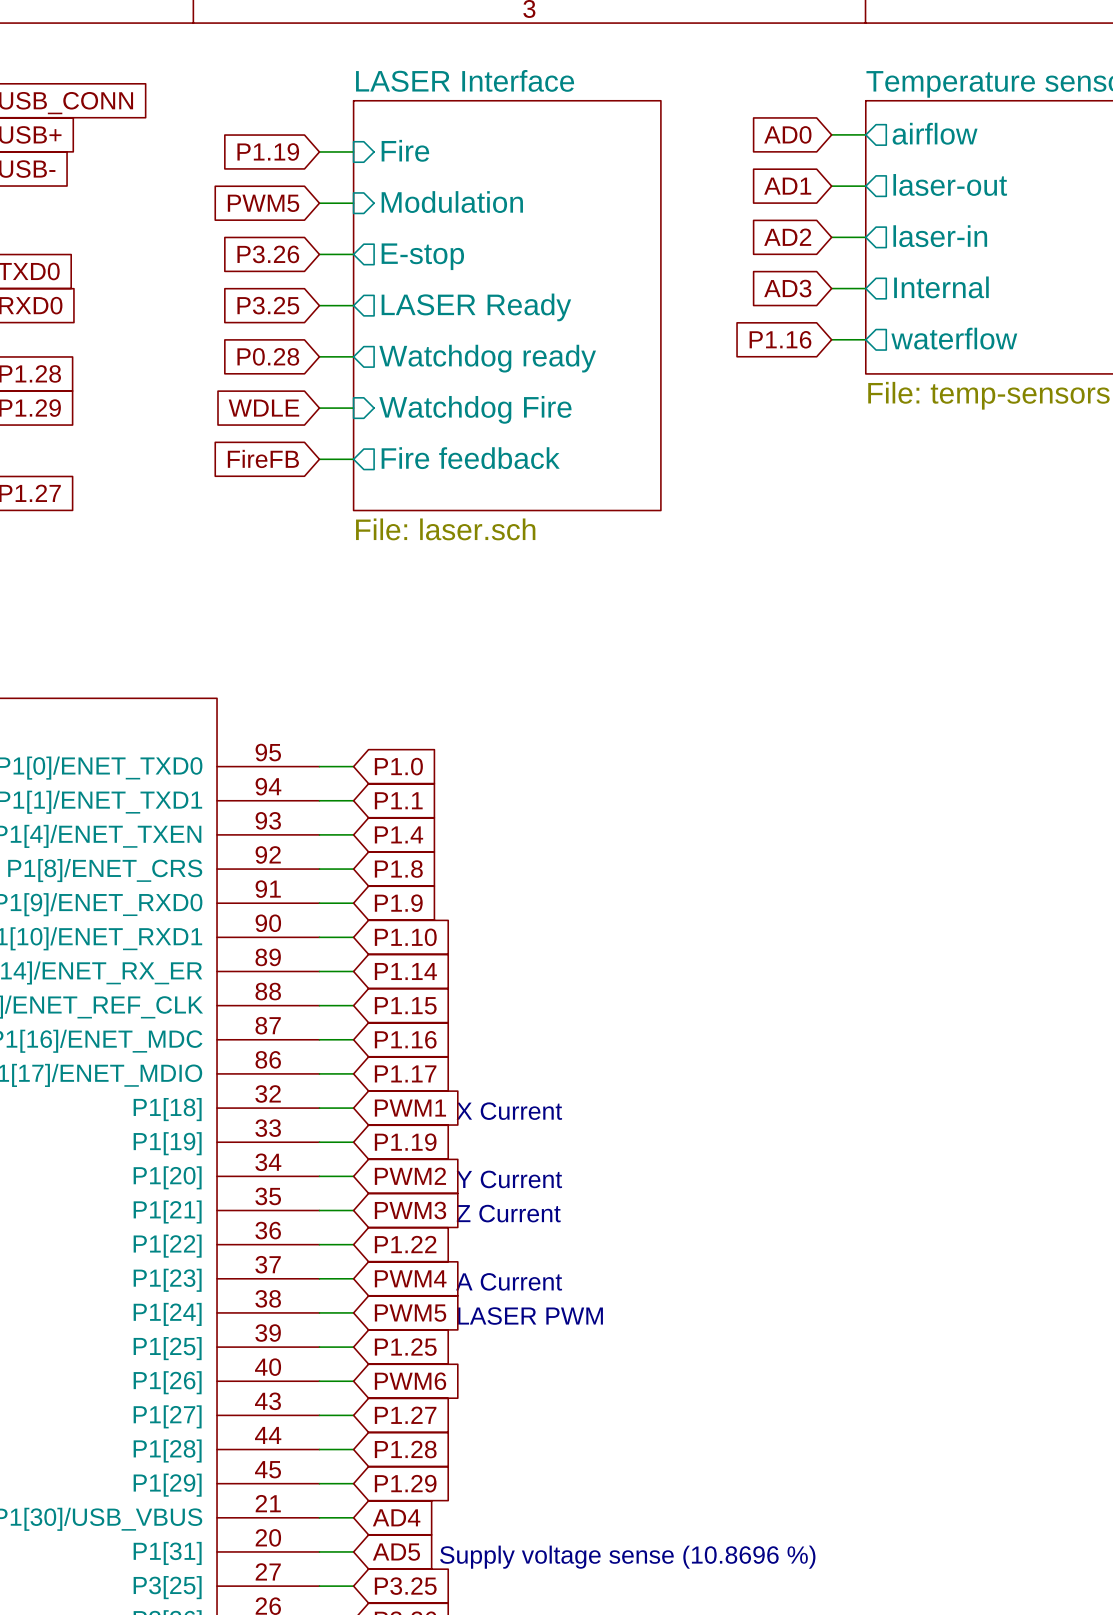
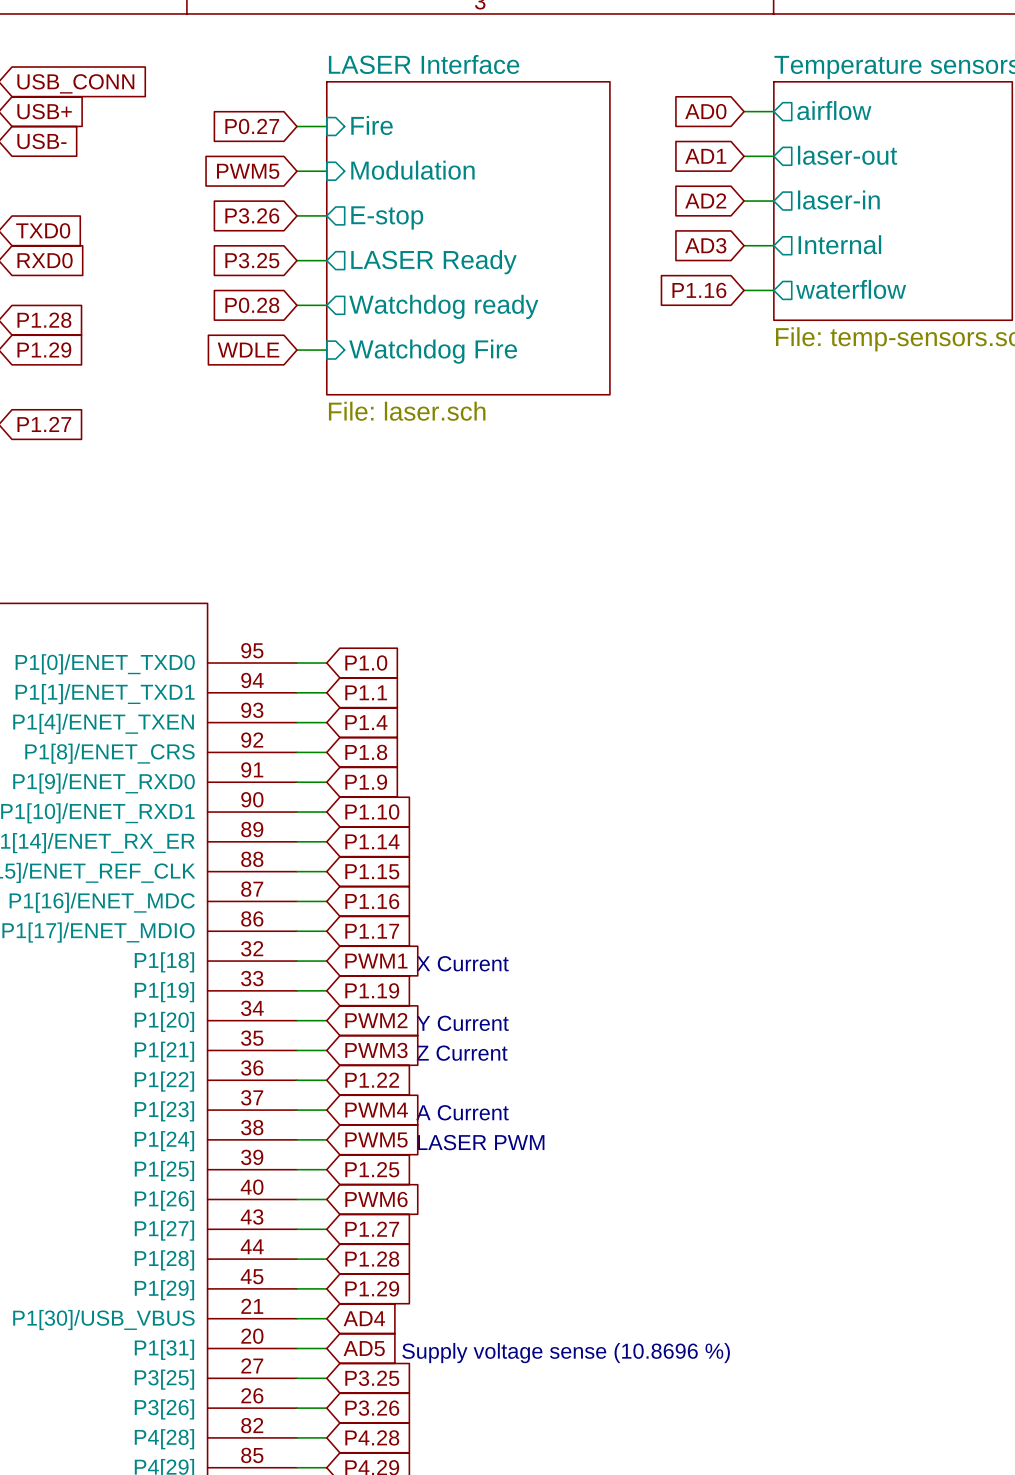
global label: P1.19 (268, 151) -> P0.27 (252, 126)
sheet LASER Interface: none -> File: laser.sch (468, 238)
sheet LASER Interface: File: laser.sch (507, 305) -> none
global label: FireFB (263, 458) -> none
sheet pin: Fire feedback (470, 458) -> none
wire: (319, 459) (353, 459) -> none

